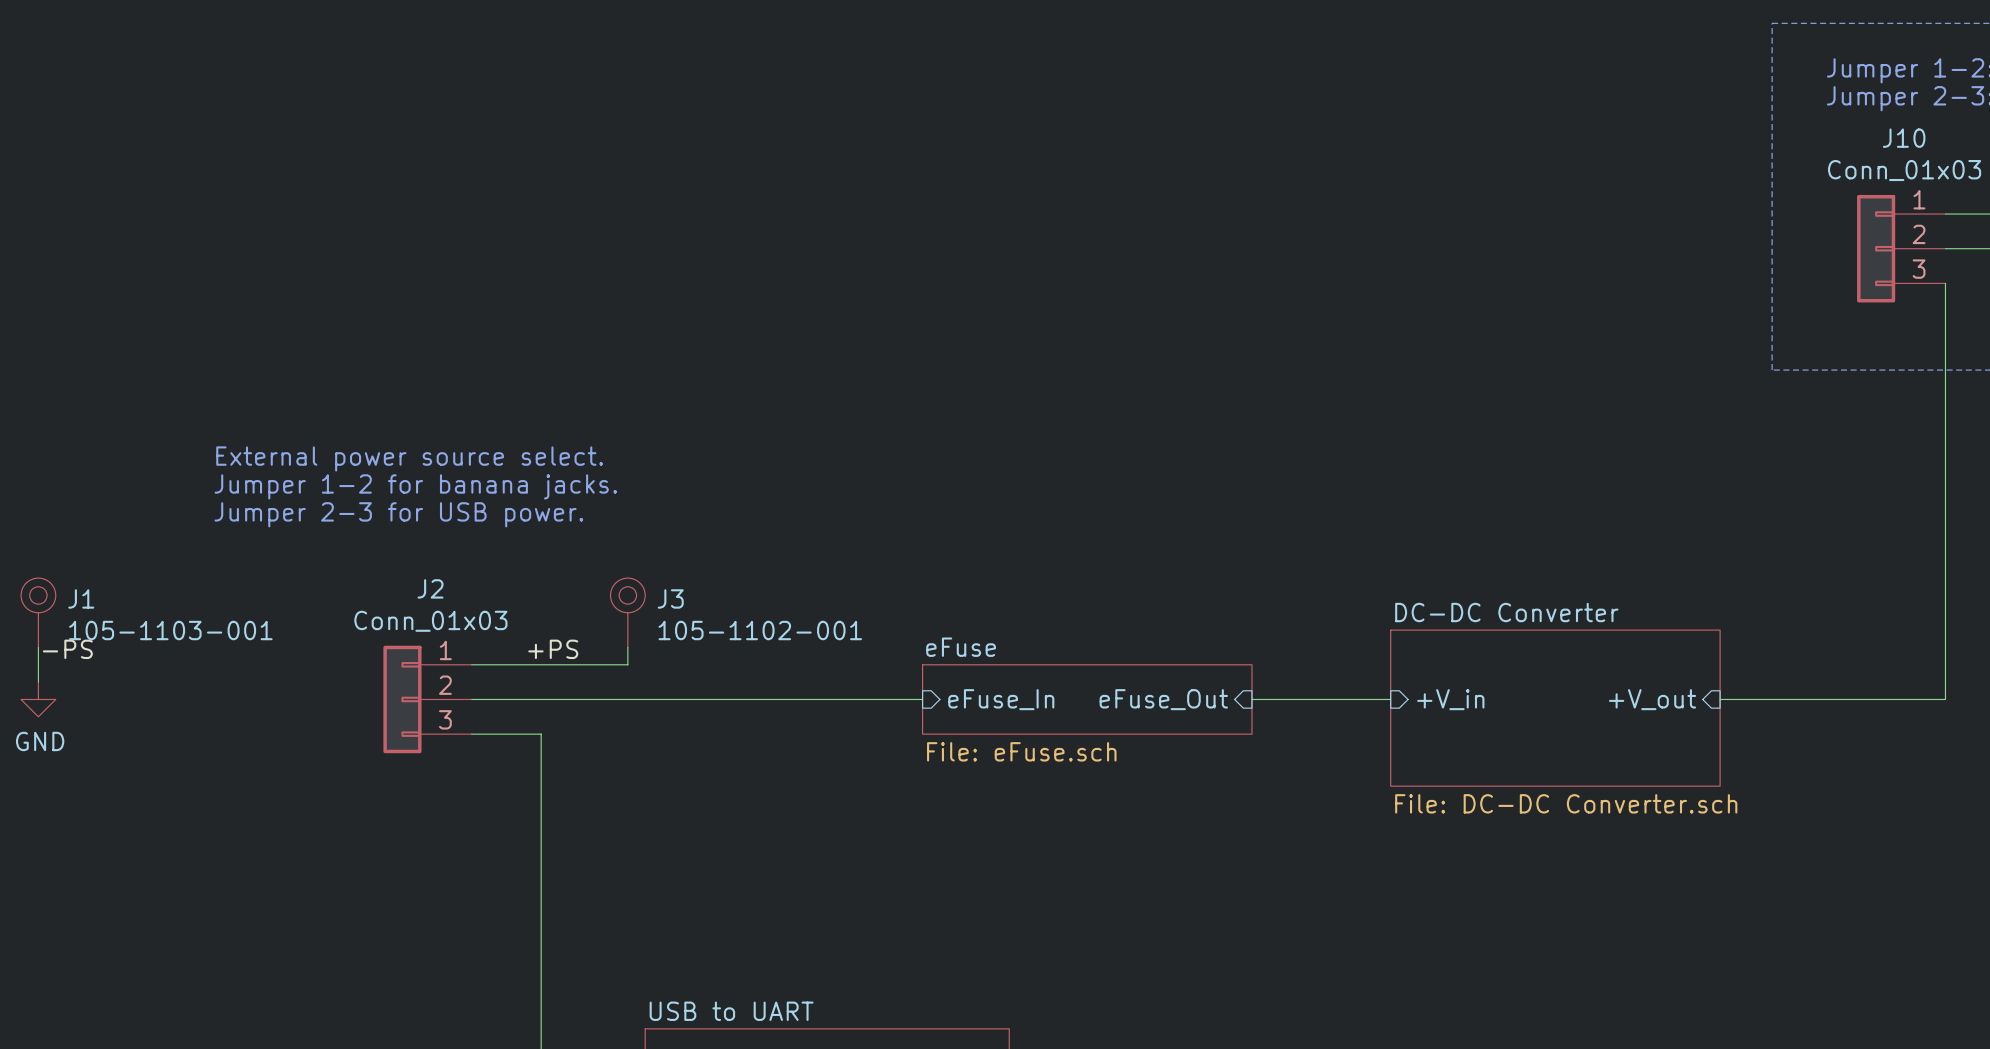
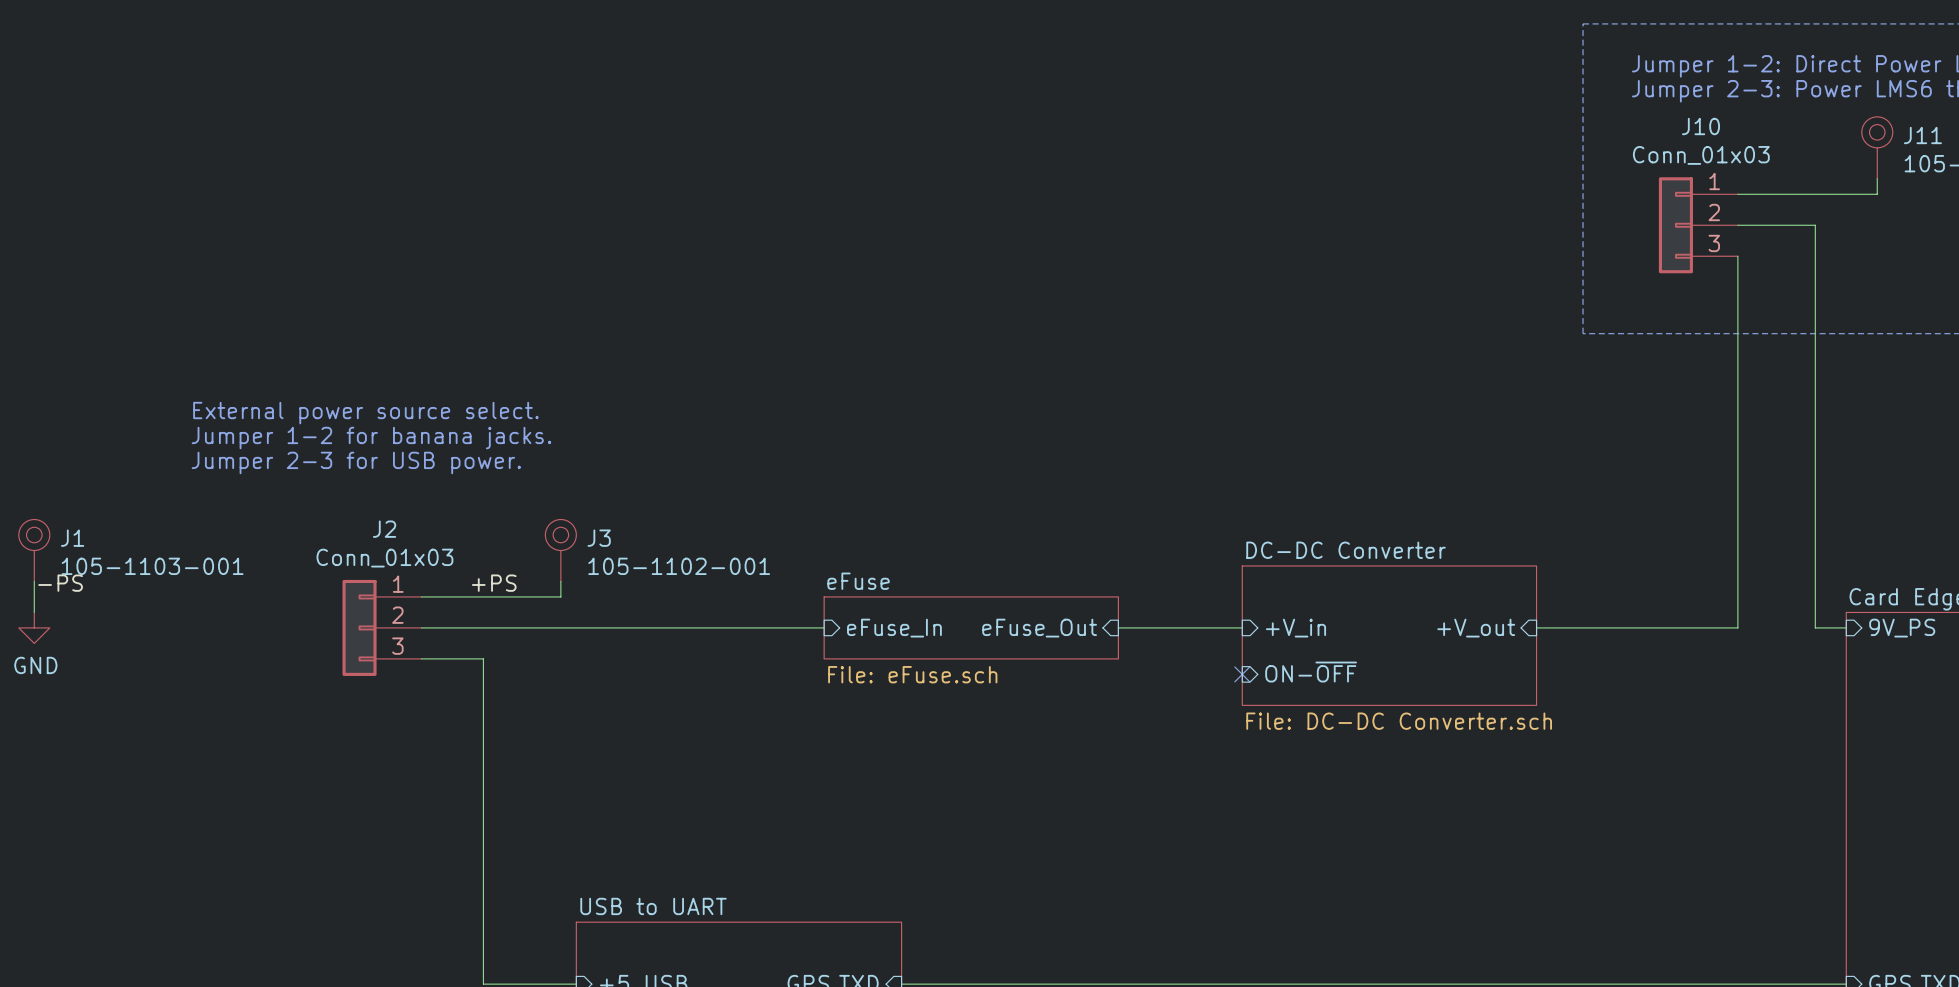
sheet pin: none -> ON-~{OFF} (1311, 672)
no-connect mark: none -> (1242, 674)

